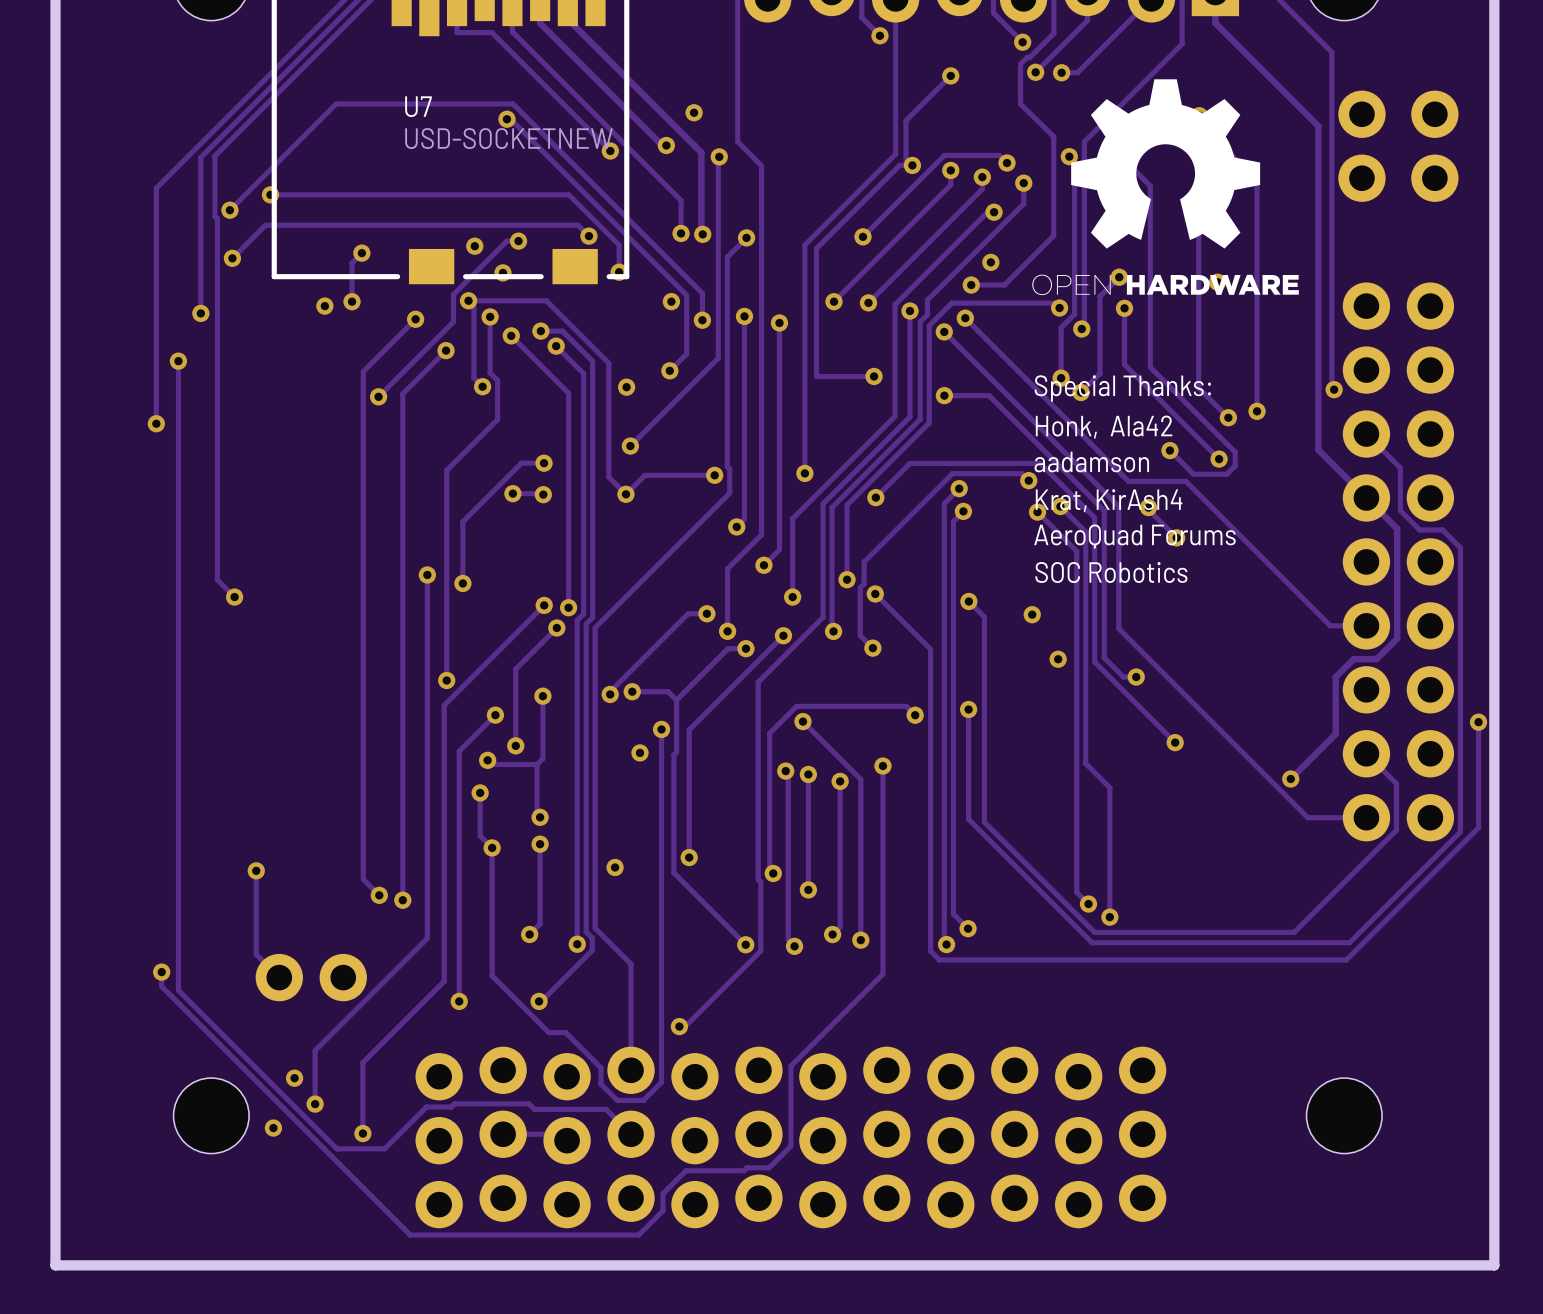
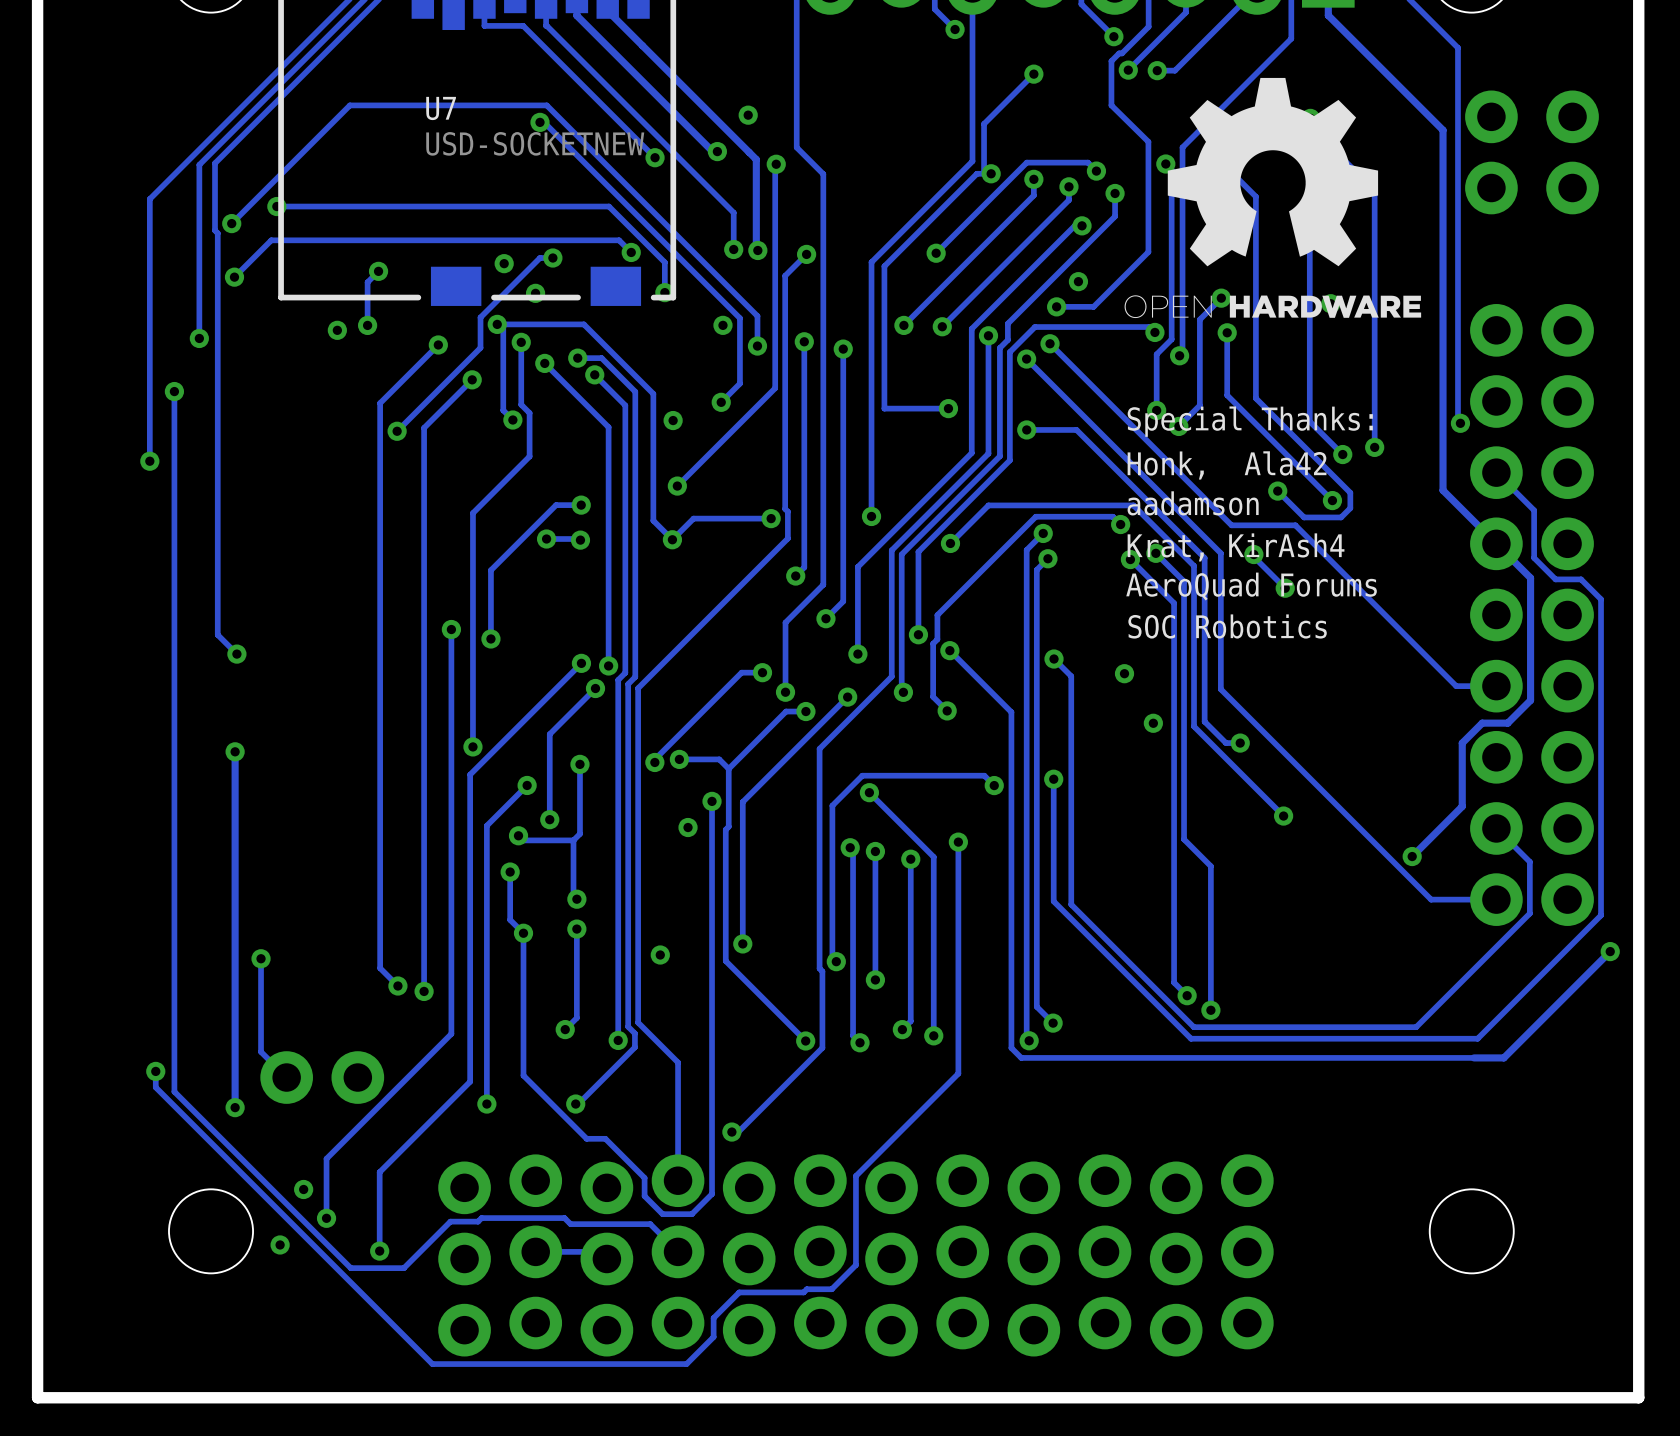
track: none -> (235, 751) (235, 1107)
via: none -> (235, 751)
track: (1478, 722) (1478, 827) (1346, 959) -> (1610, 951) (1503, 1057) (1474, 1057)
via position: (1478, 722) -> (1610, 951)
via: none -> (235, 1107)

